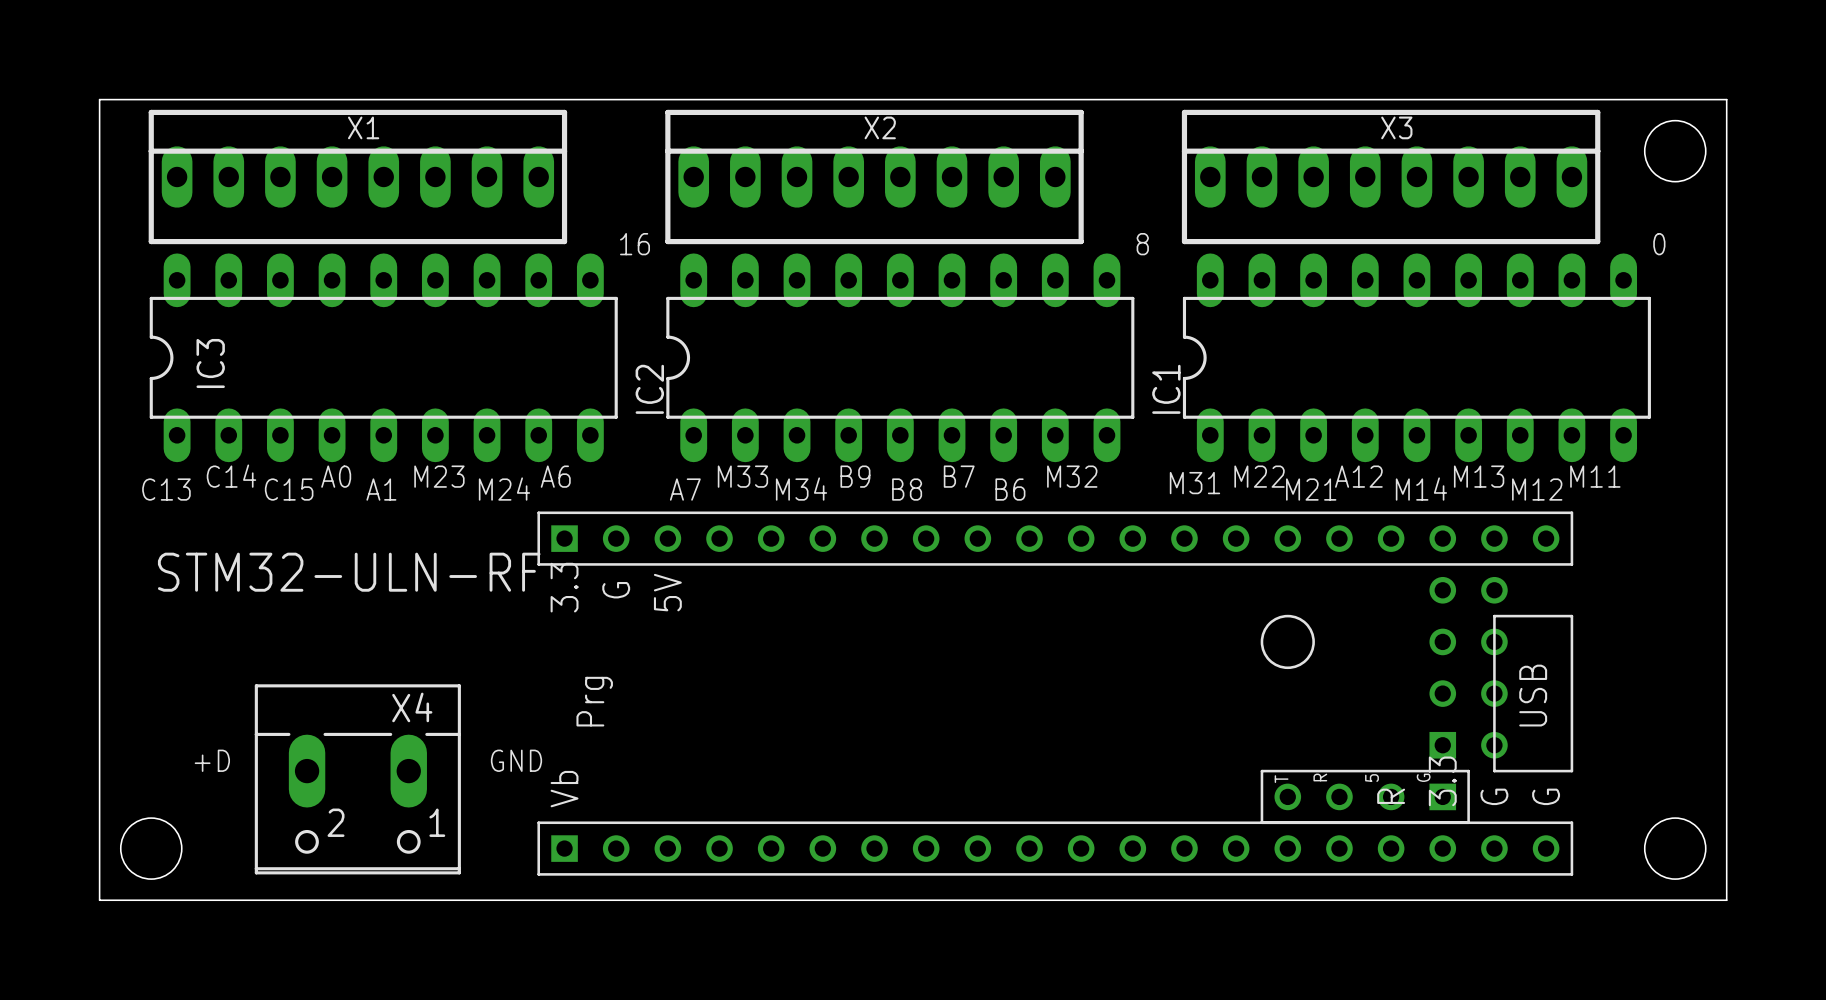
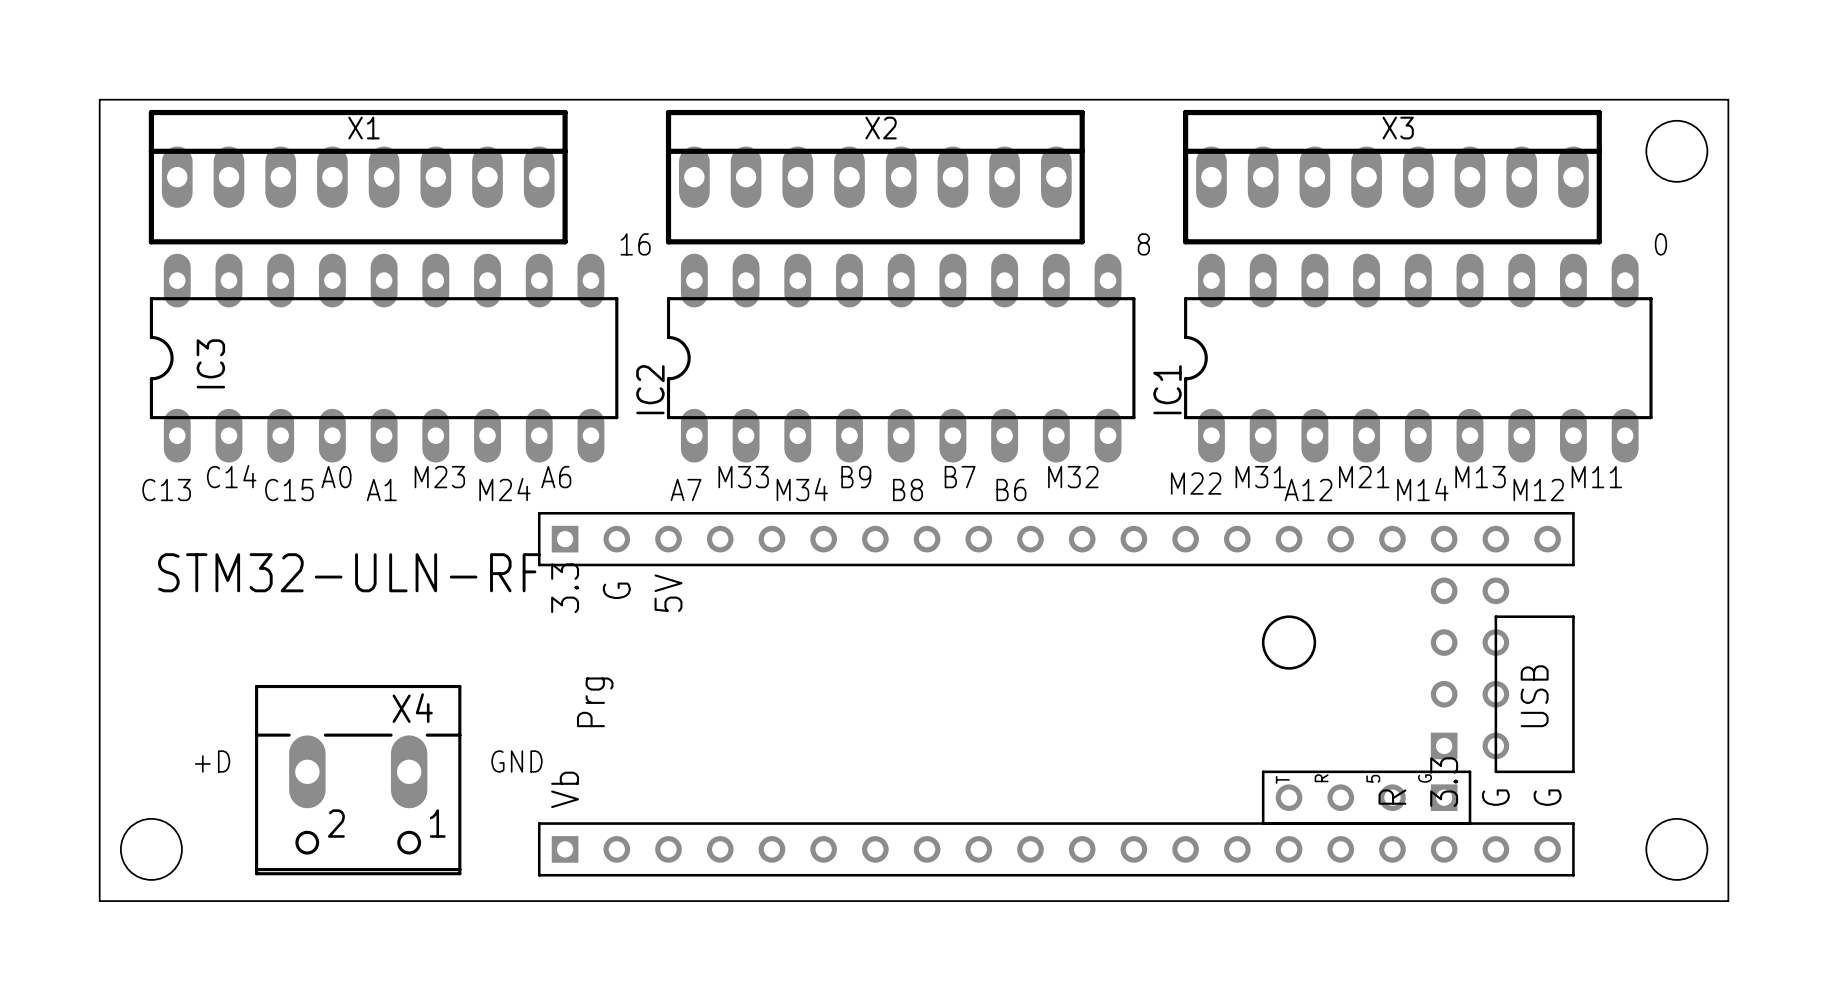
text: M22 (1259, 476) -> M31 (1260, 477)
text: A12 (1358, 476) -> M21 (1364, 477)
text: M31 (1194, 483) -> M22 (1196, 483)
text: M21 (1311, 489) -> A12 (1308, 490)

